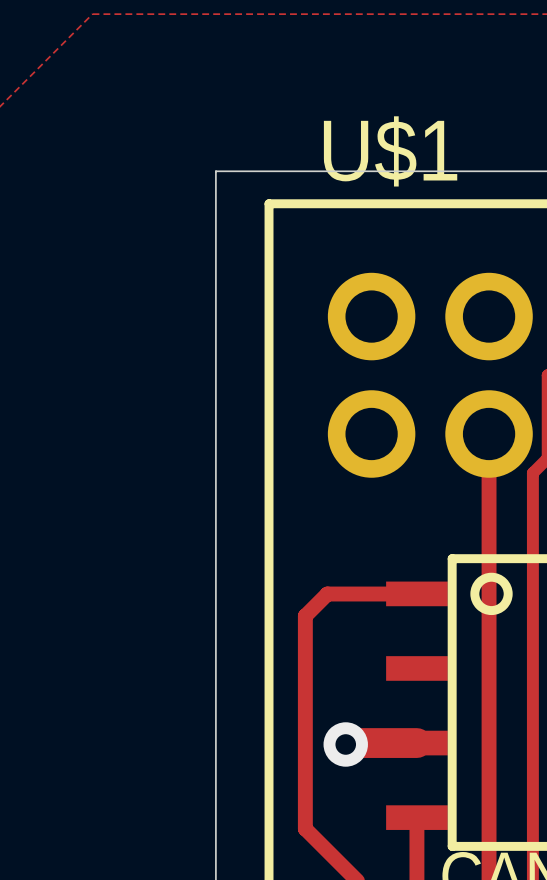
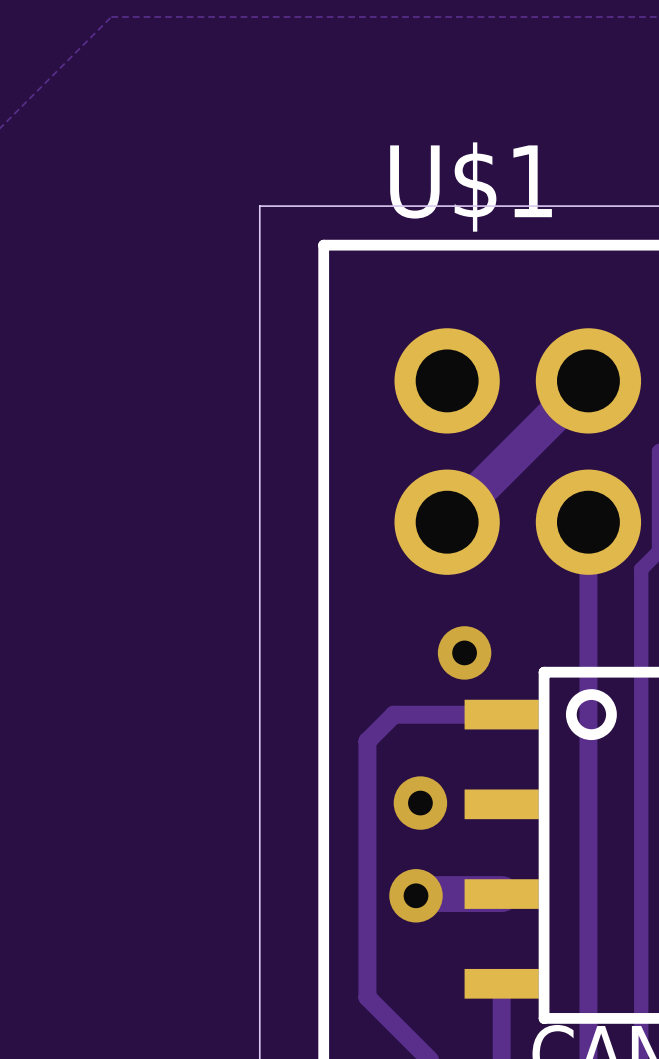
track: none -> (588, 380) (447, 522)
via: none -> (464, 652)
via: none -> (420, 803)

